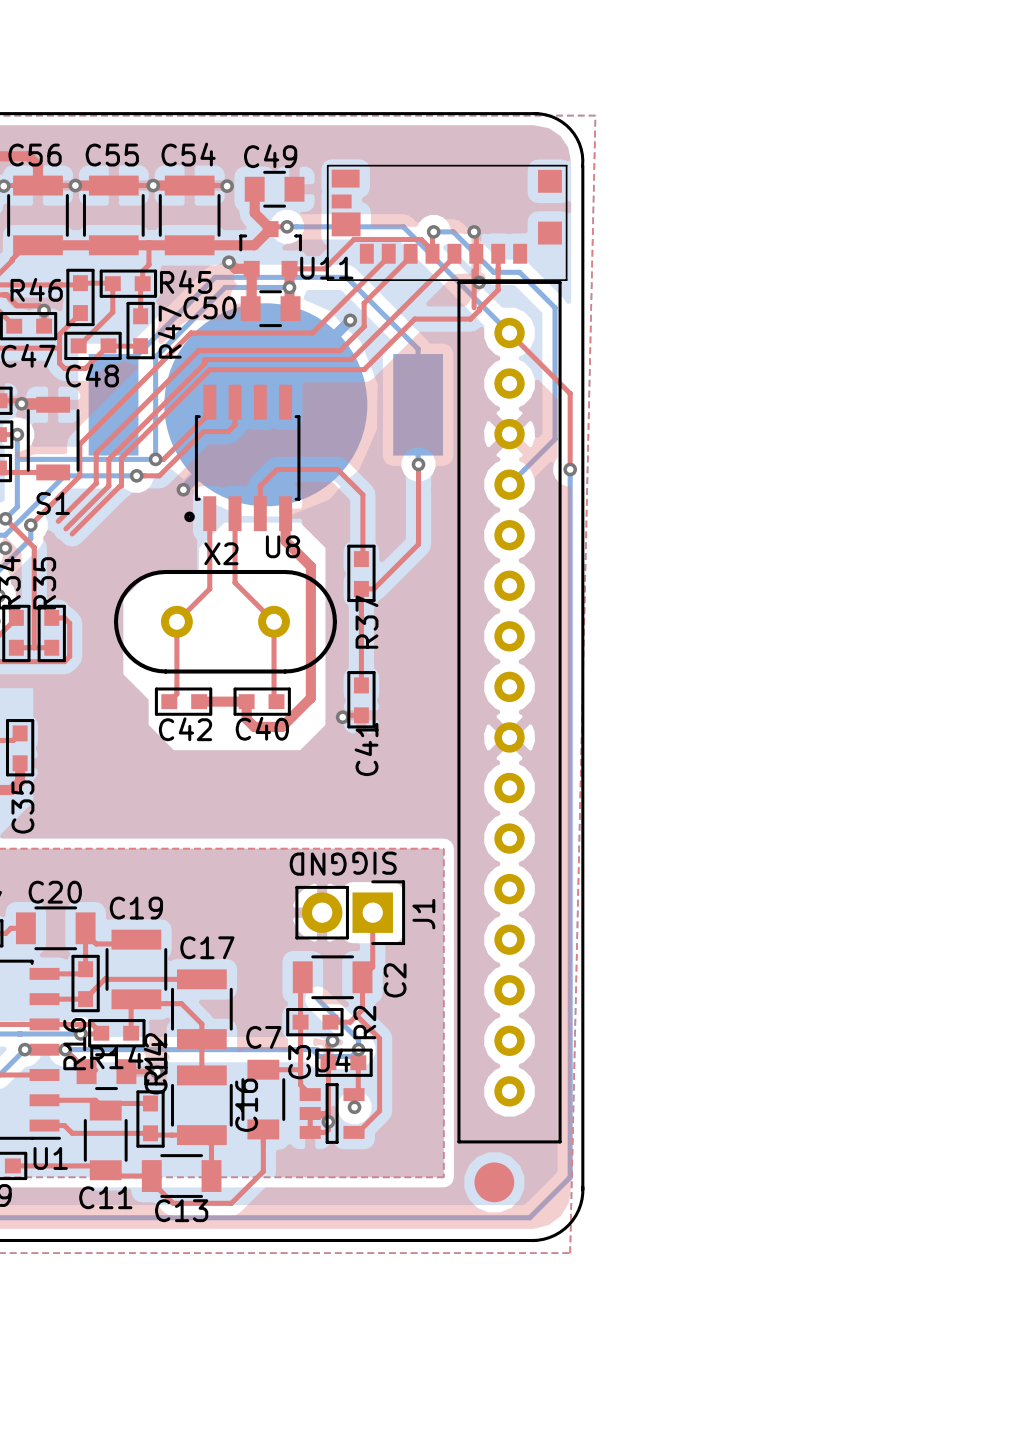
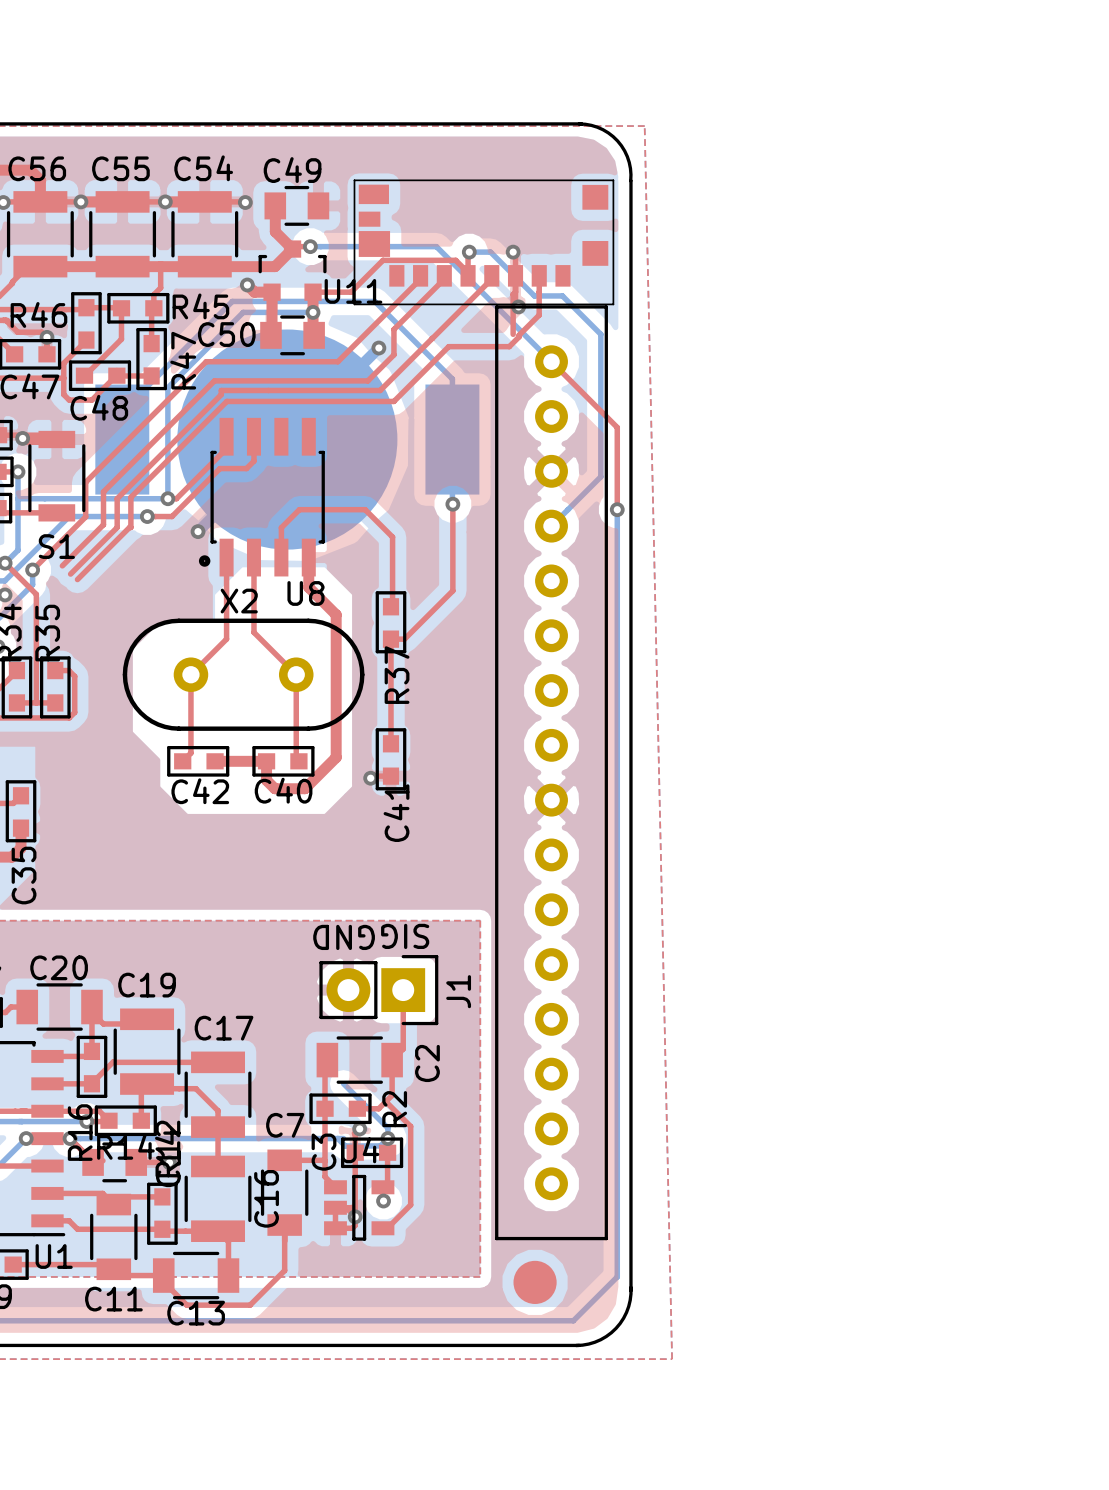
top zone outline: (595, 115) (570, 1253) -> (644, 126) (672, 1359) (617, 1359)

